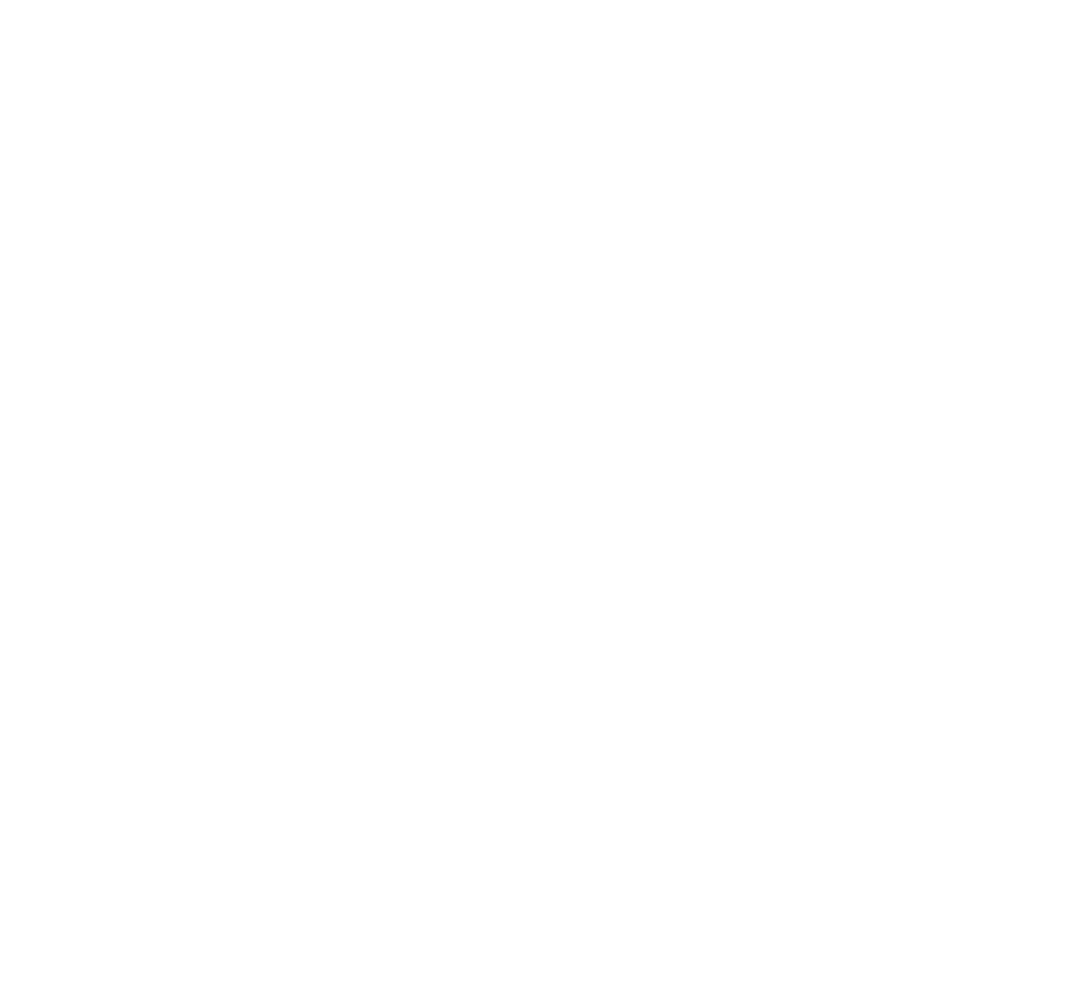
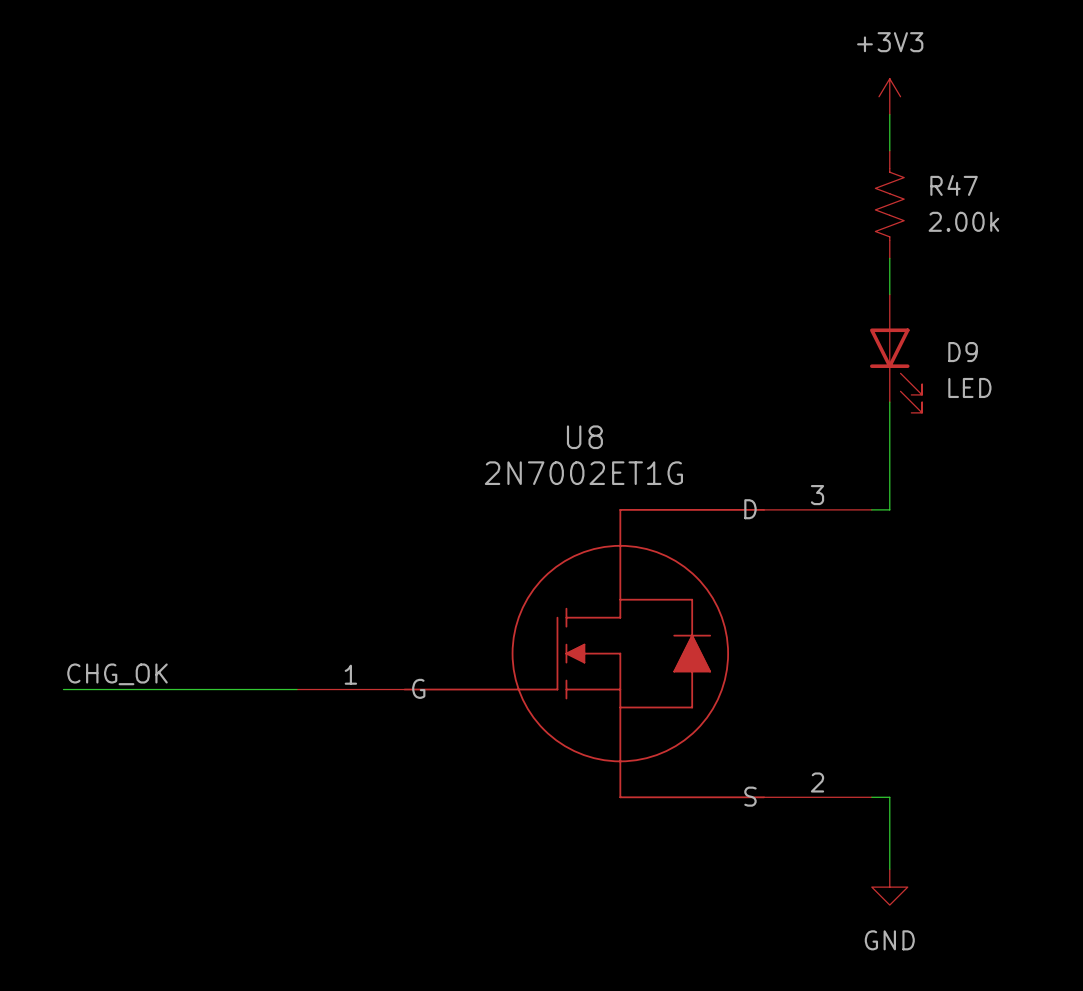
power symbol: none -> +3V3 (889, 96)
wire: none -> (889, 114) (889, 150)
R47: none -> 2.00k (889, 204)
wire: none -> (889, 258) (889, 294)
D9: none -> LED (896, 353)
wire: none -> (889, 402) (889, 509) (871, 509)
U8: none -> 2N7002ET1G (584, 653)
label: none -> CHG_OK (117, 674)
wire: none -> (63, 689) (297, 689)
wire: none -> (871, 797) (889, 797) (889, 869)
power symbol: none -> GND (889, 887)

